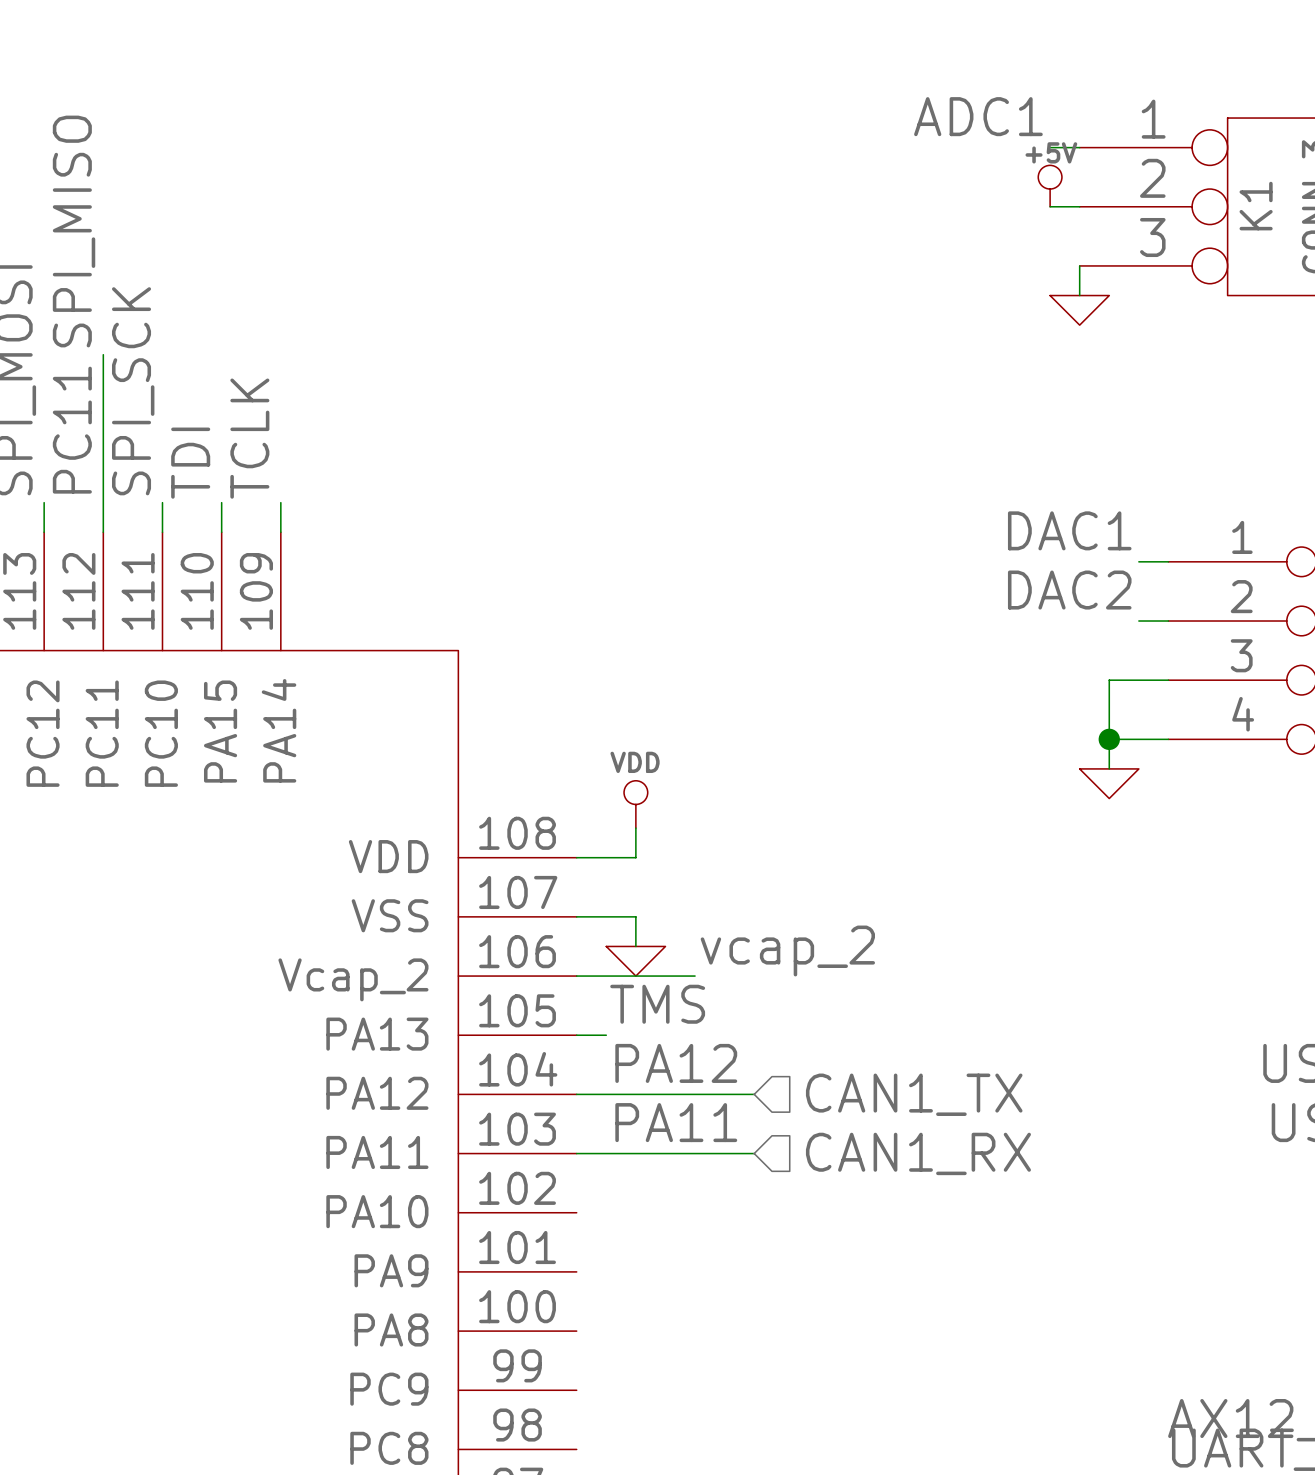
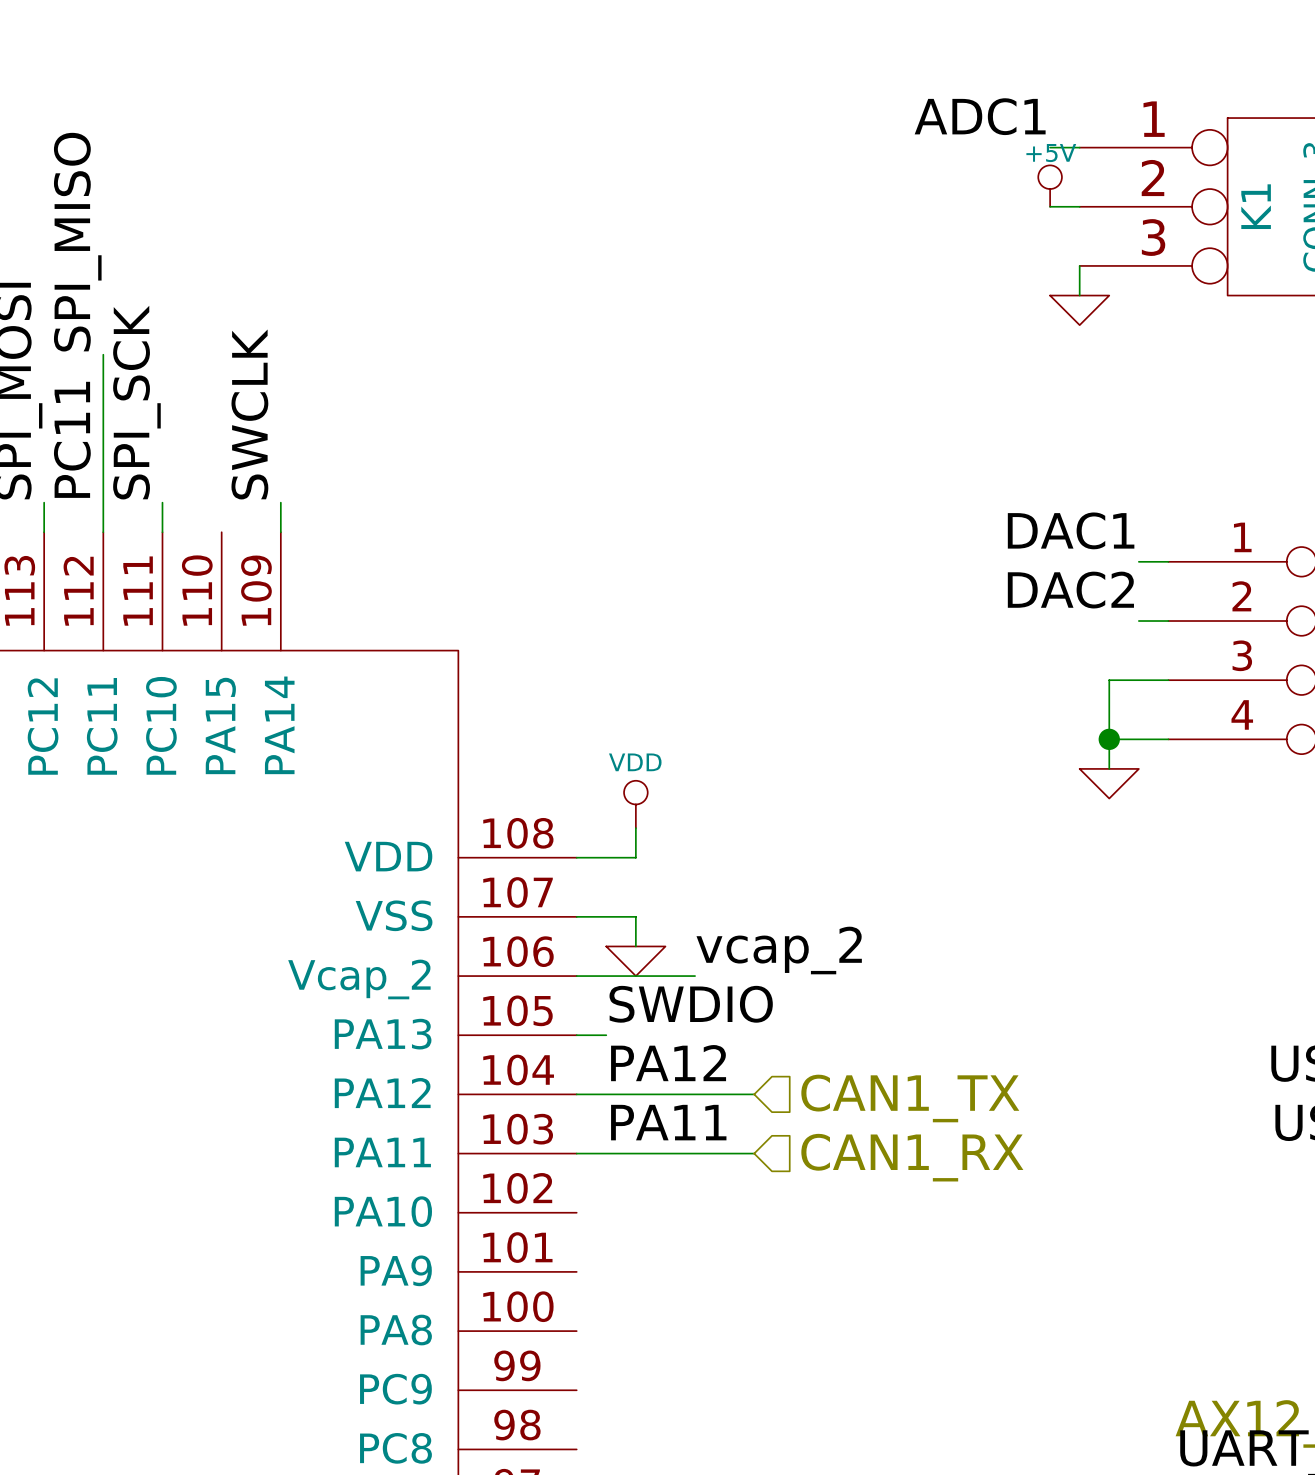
label: TCLK (249, 438) -> SWCLK (249, 414)
label: TDI (190, 463) -> none
wire: (221, 502) (221, 532) -> none
label: TMS (657, 1004) -> SWDIO (691, 1004)

